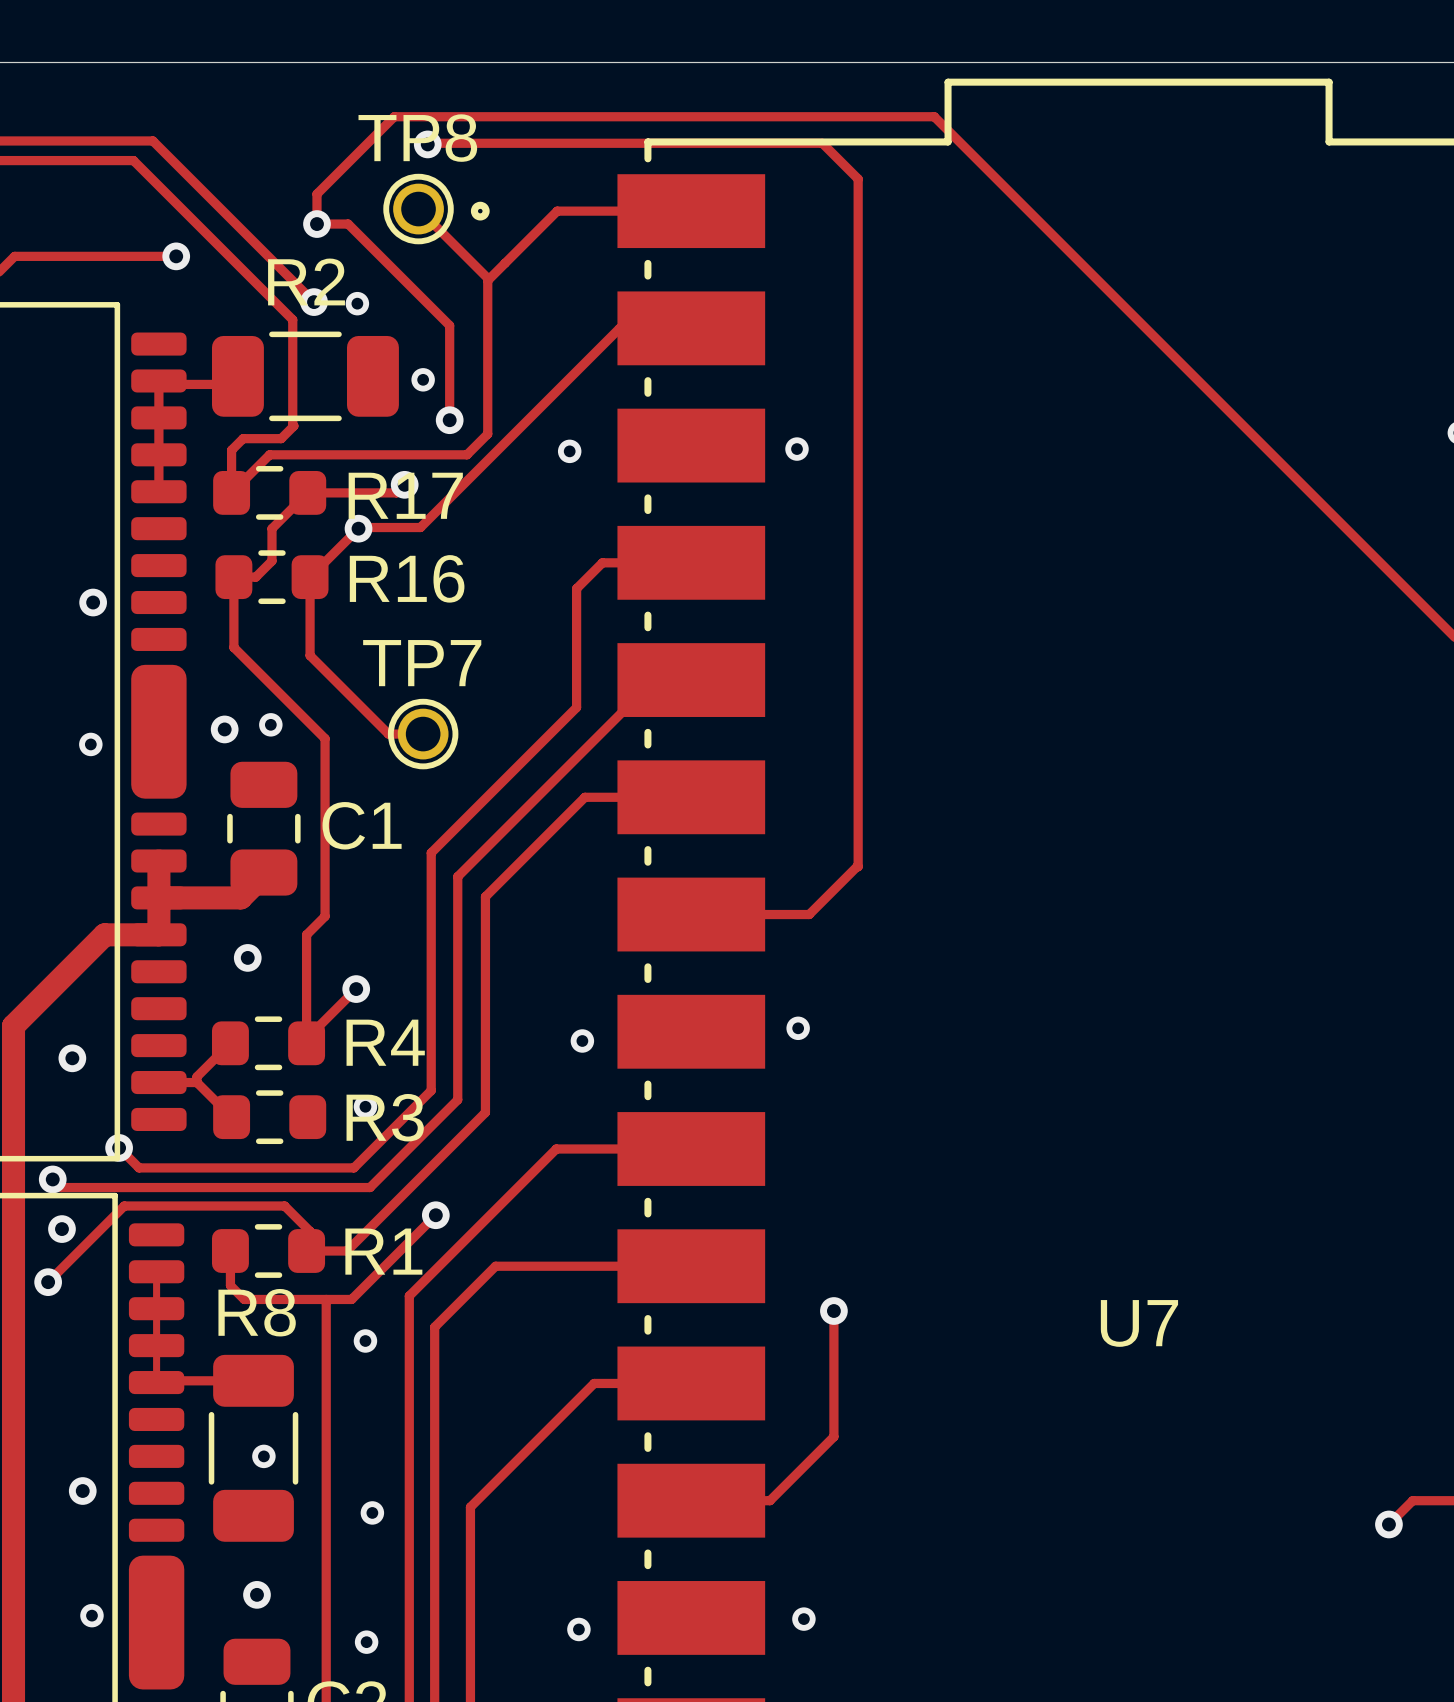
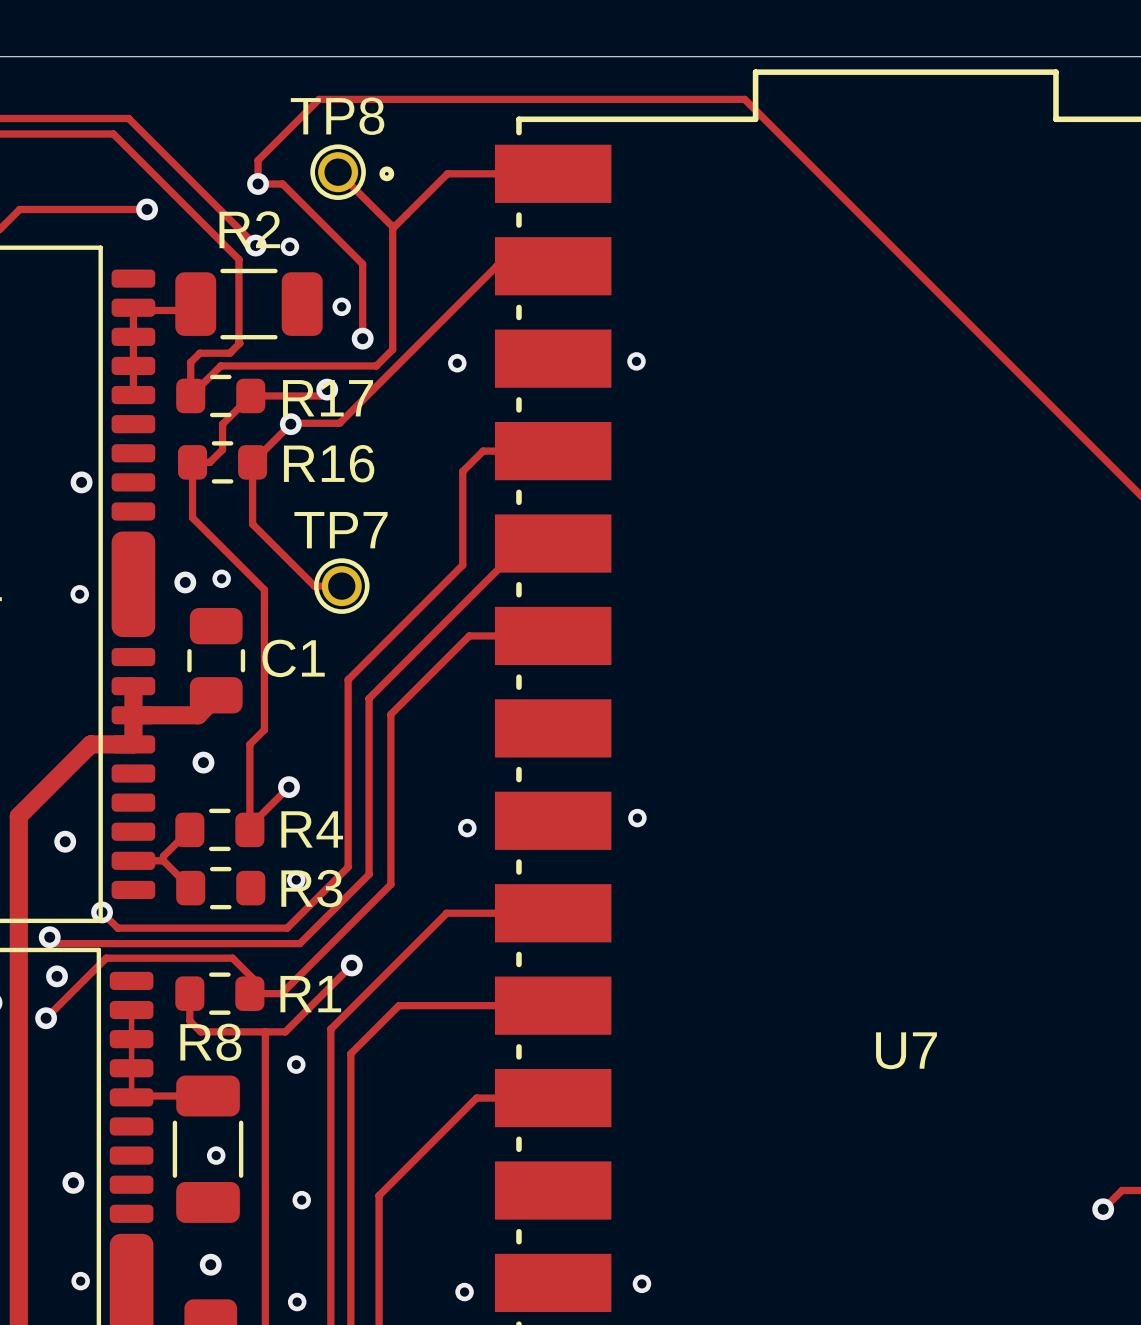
track: (427, 144) (822, 143) (858, 179) (858, 866) (809, 914) (691, 914) -> none
via: (427, 144) -> none
track: (833, 1311) (833, 1436) (770, 1500) (691, 1500) -> none
via: (833, 1311) -> none

